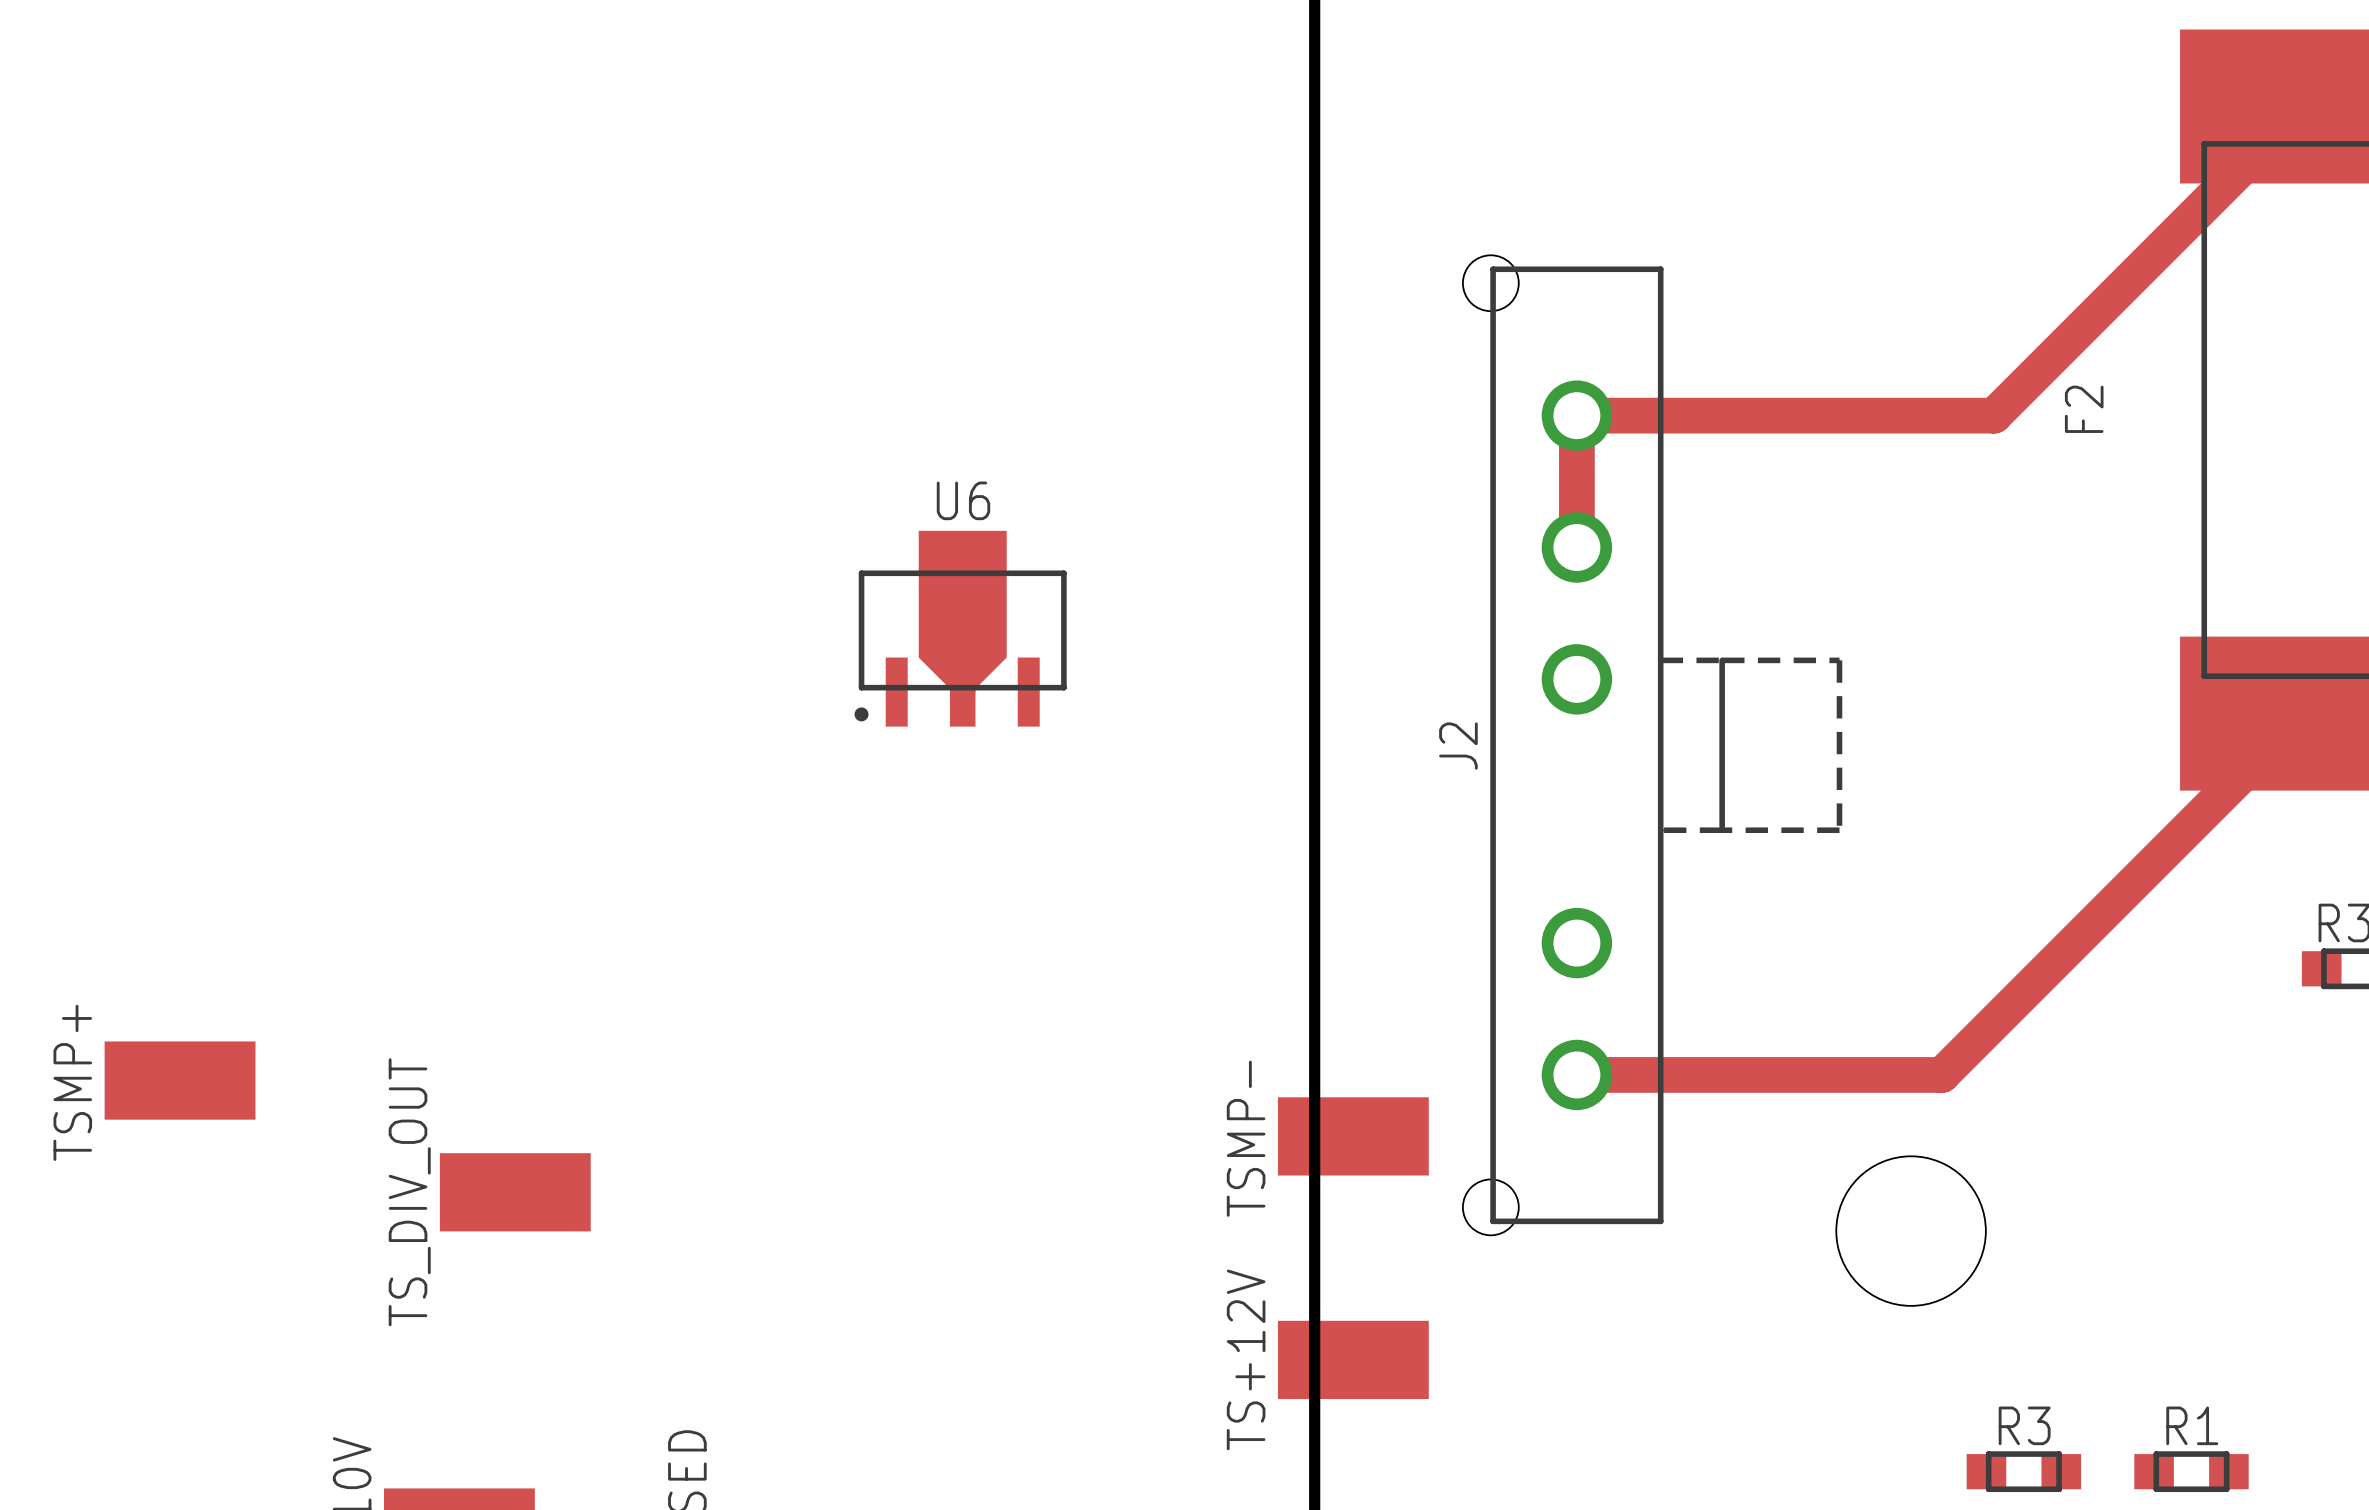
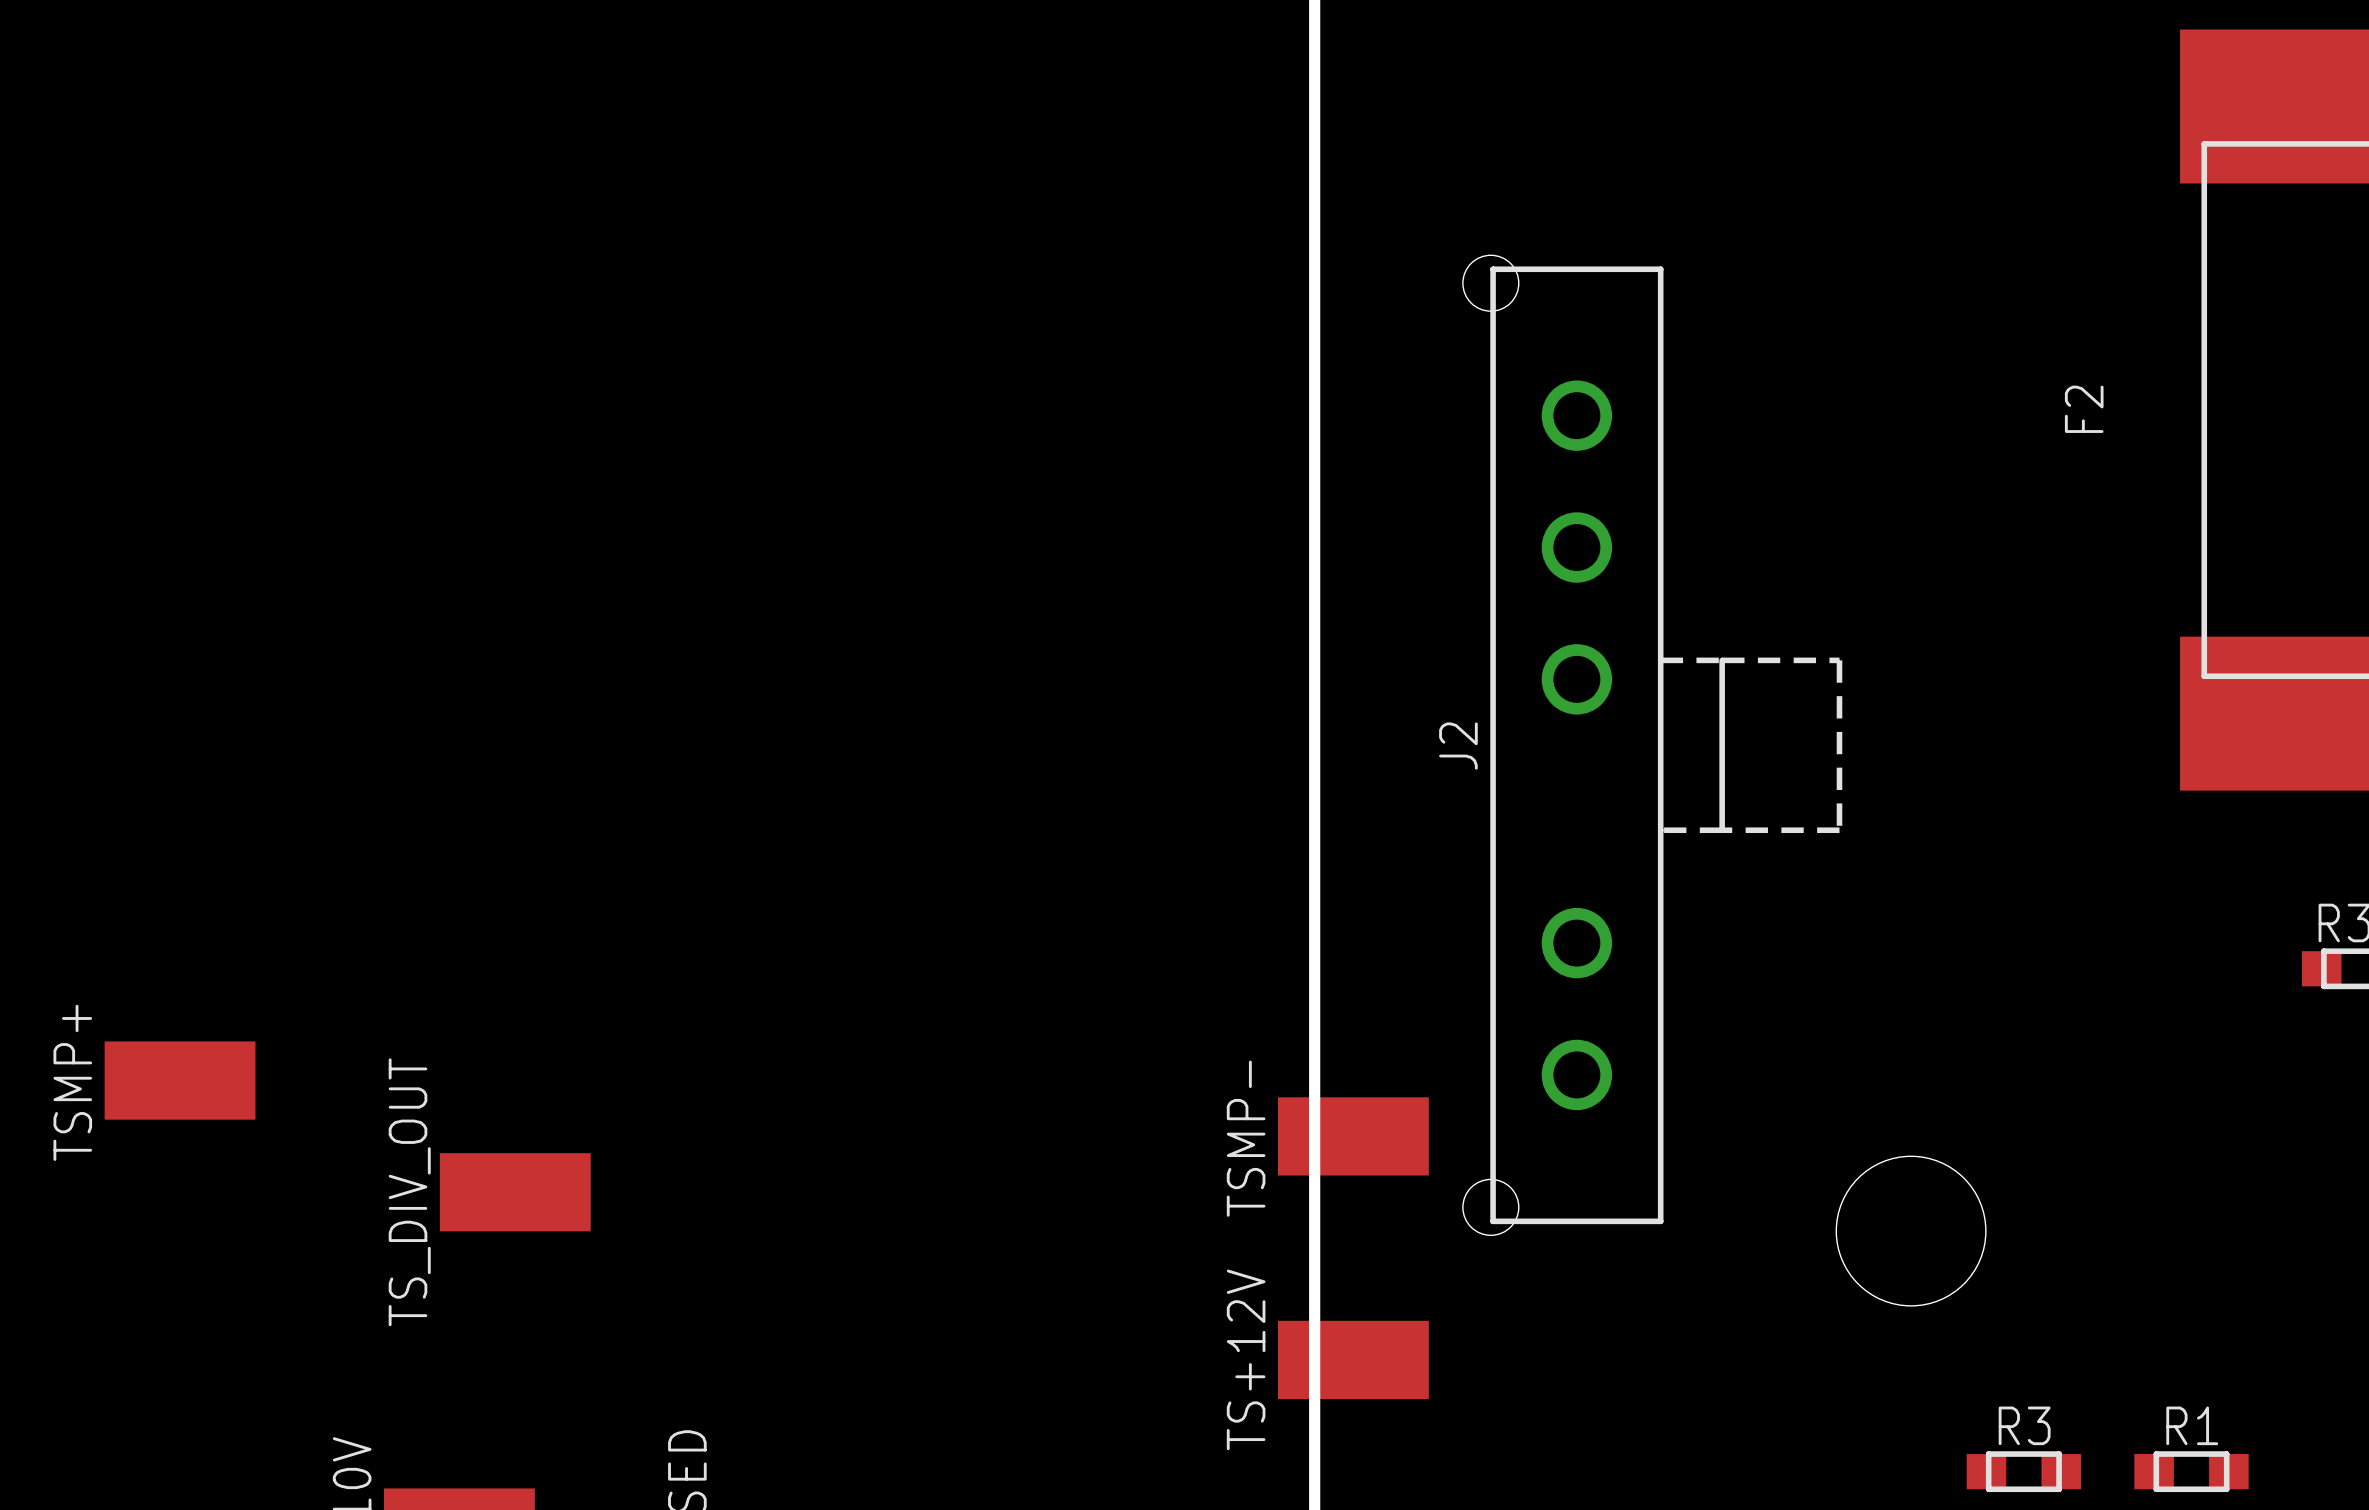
top track: (2303, 106) (1994, 415) (1576, 415) (1576, 547) -> none
U6: (960, 628) -> none
top track: (2303, 713) (1941, 1074) (1576, 1074) -> none

